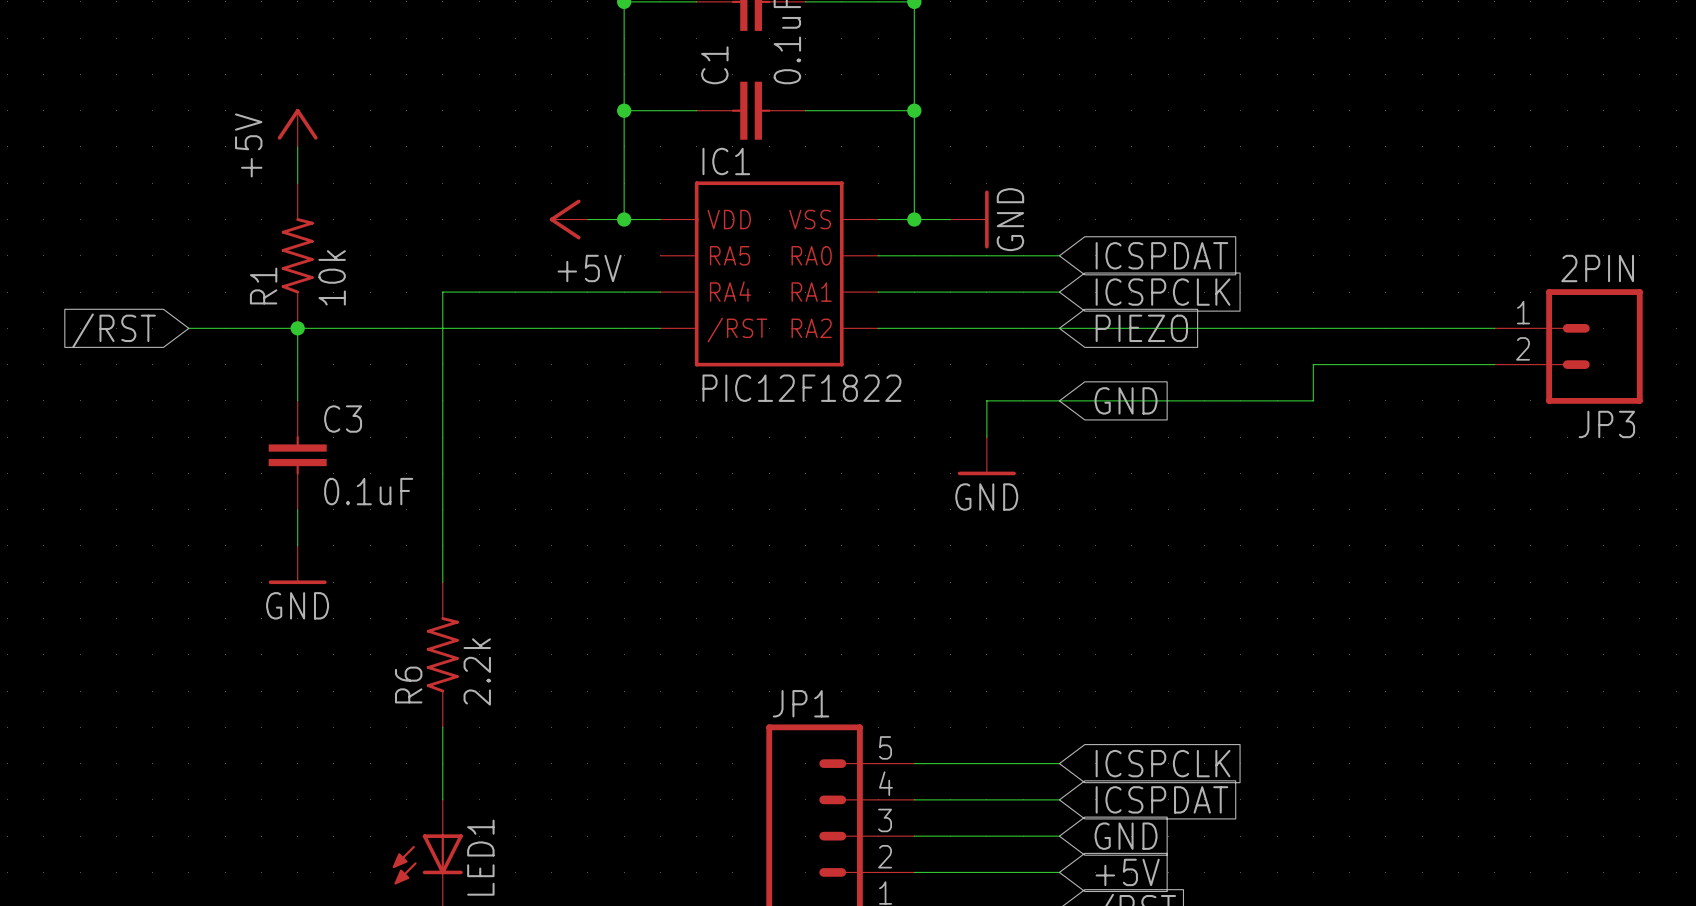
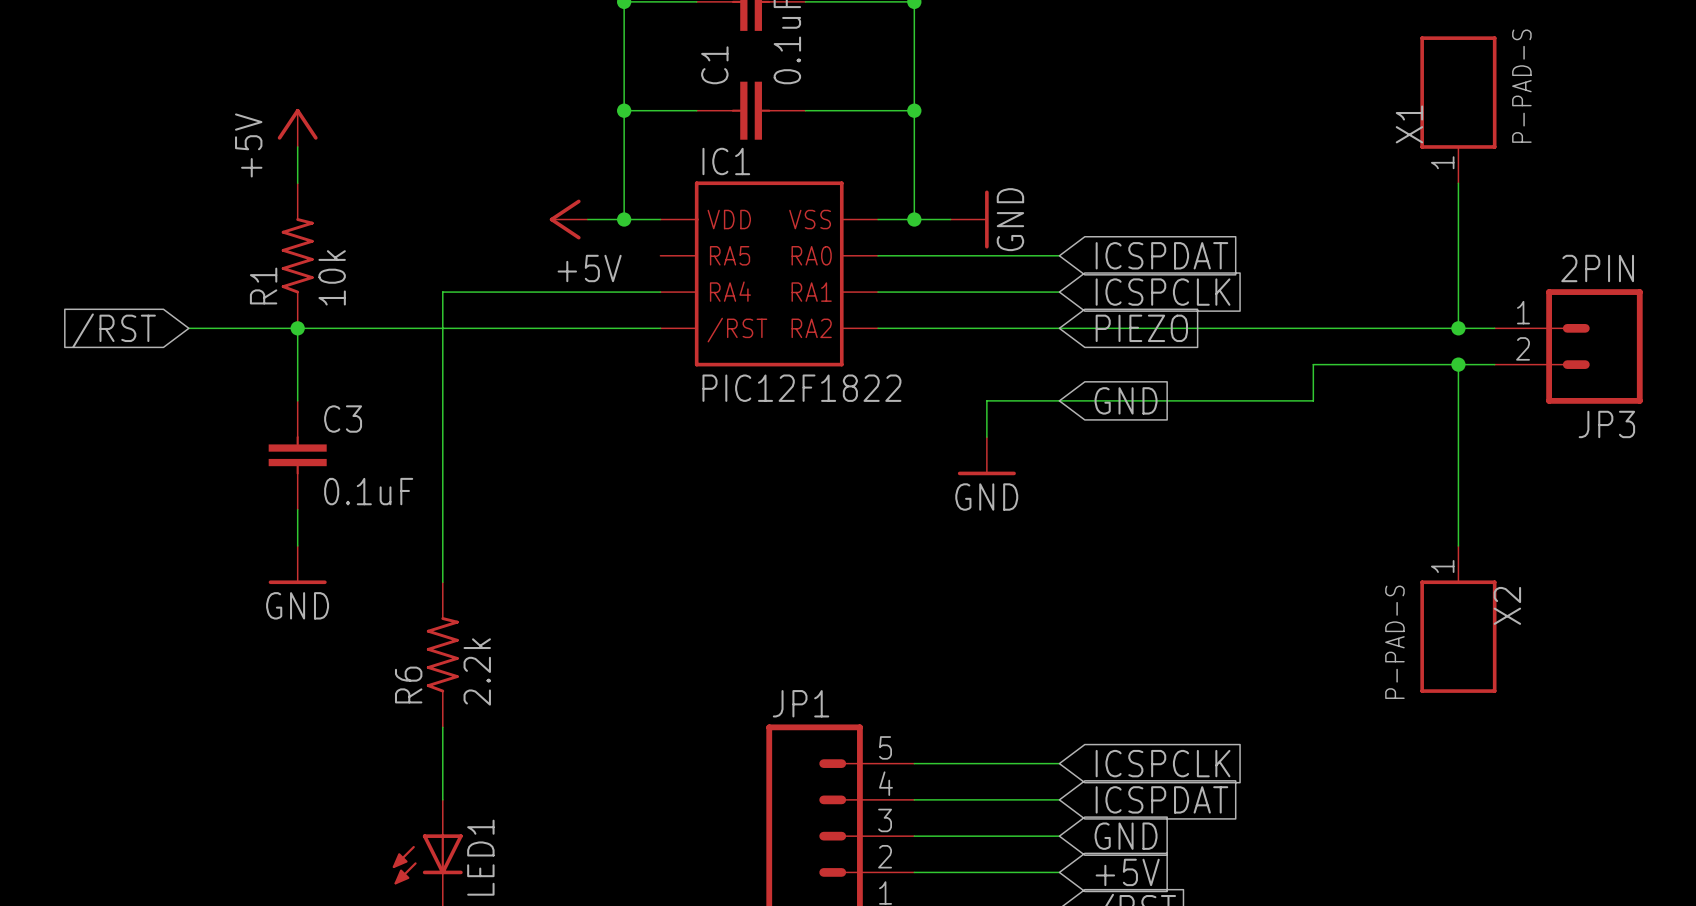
X1: none -> P-PAD-S (1458, 109)
wire: none -> (1458, 183) (1458, 328)
junction: none -> (1458, 328)
wire: none -> (1458, 364) (1458, 545)
junction: none -> (1458, 364)
X2: none -> P-PAD-S (1458, 619)

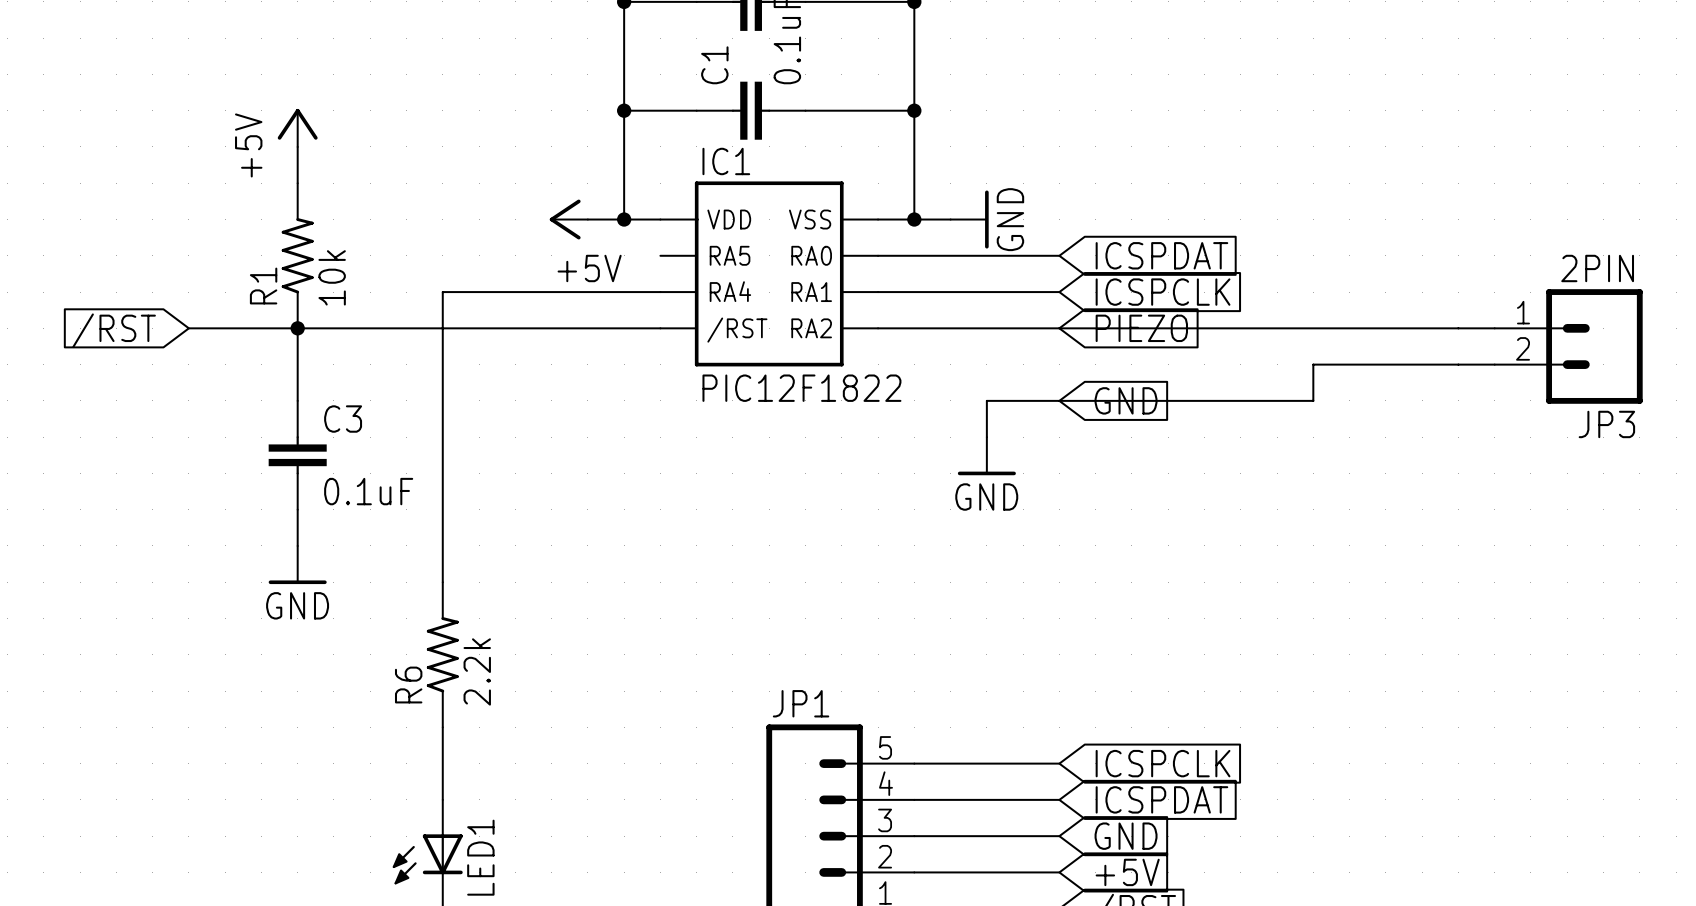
X1: P-PAD-S (1458, 109) -> none
wire: (1458, 183) (1458, 328) -> none
junction: (1458, 328) -> none
wire: (1458, 364) (1458, 545) -> none
junction: (1458, 364) -> none
X2: P-PAD-S (1458, 619) -> none

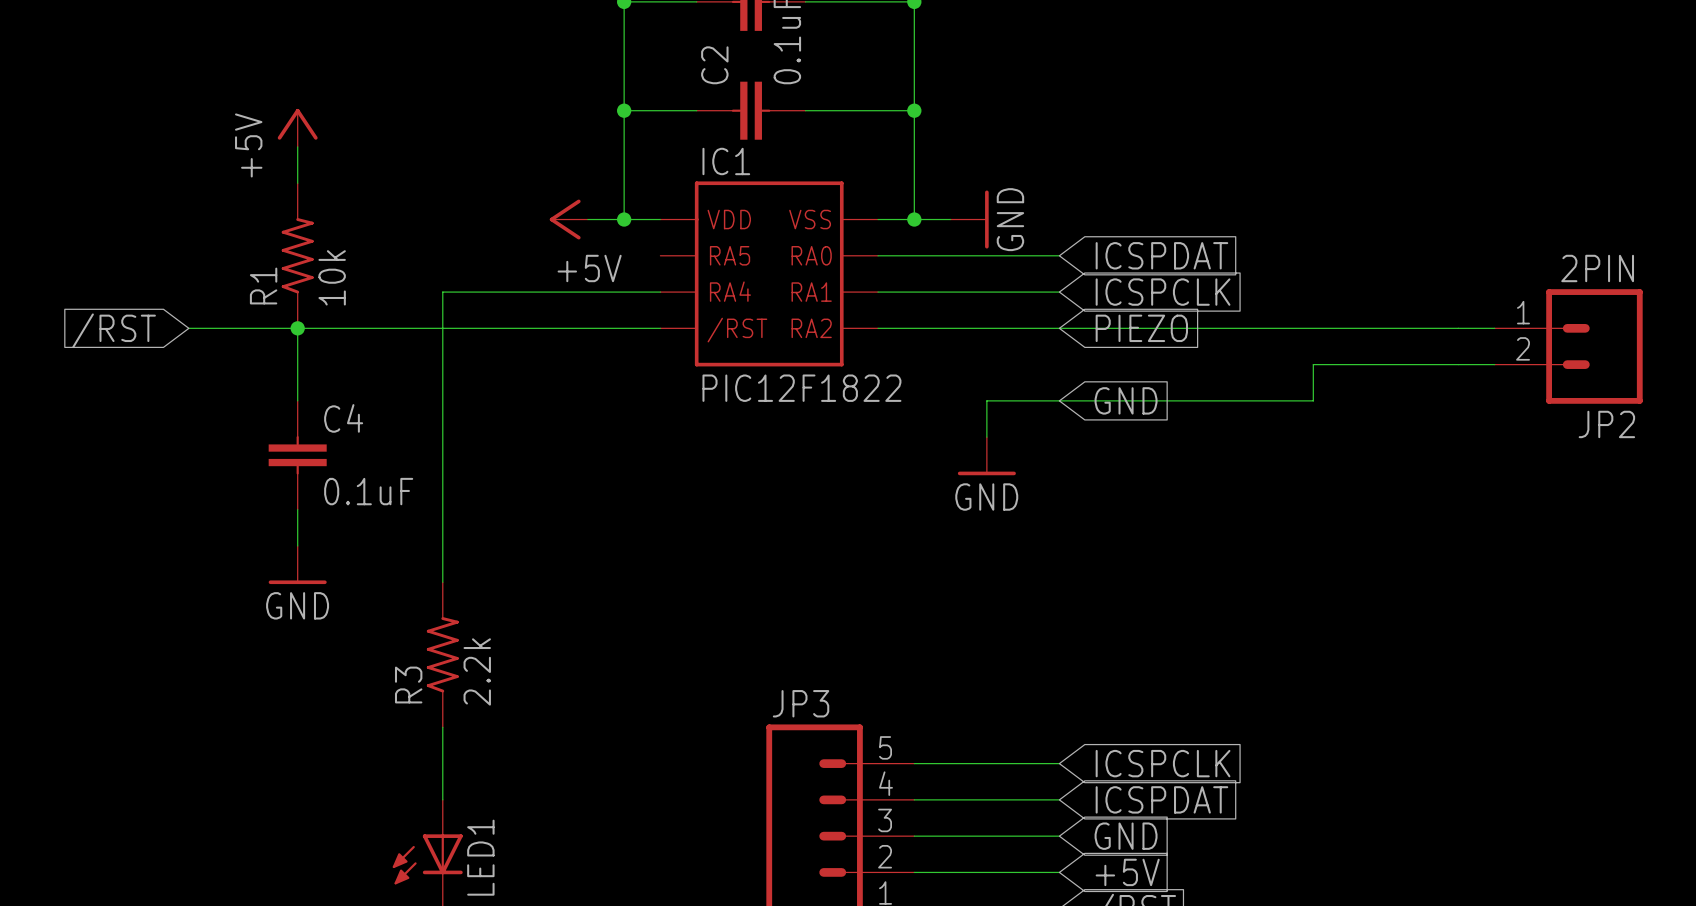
C1 name: C1 (714, 65) -> C2 (714, 65)
C3 name: C3 (343, 419) -> C4 (343, 418)
JP3 name: JP3 (1606, 424) -> JP2 (1606, 424)
R6 name: R6 (408, 685) -> R3 (408, 685)
JP1 name: JP1 (801, 703) -> JP3 (801, 703)

